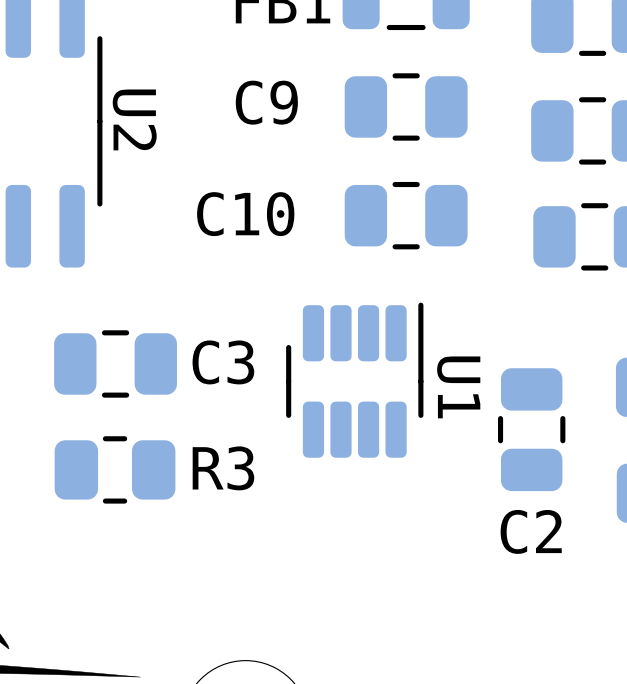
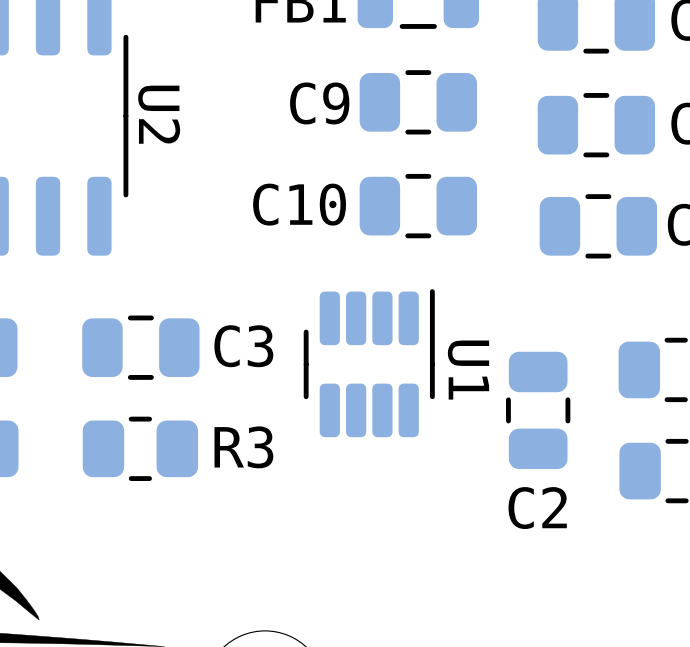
C9 name position: C9 (266, 102) -> C9 (319, 103)
C10 name position: C10 (245, 214) -> C10 (299, 204)

